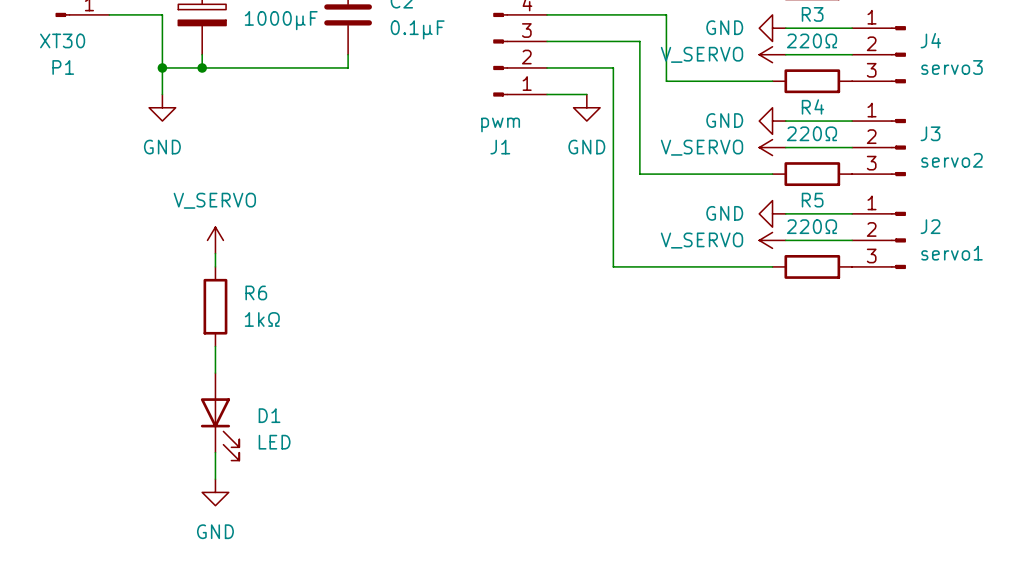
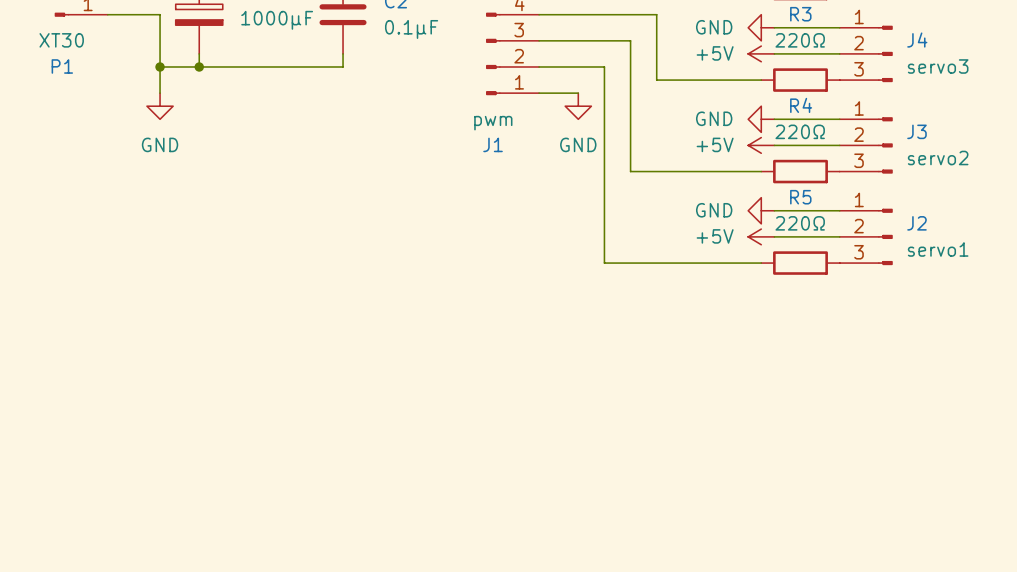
power symbol: V_SERVO (772, 54) -> +5V (761, 53)
power symbol: V_SERVO (772, 147) -> +5V (761, 145)
power symbol: V_SERVO (215, 240) -> none
power symbol: V_SERVO (772, 240) -> +5V (761, 236)
wire: (215, 253) (215, 266) -> none
R6: 1kΩ (215, 306) -> none
wire: (215, 346) (215, 373) -> none
D1: LED (220, 416) -> none
wire: (215, 452) (215, 479) -> none
power symbol: GND (215, 492) -> none

